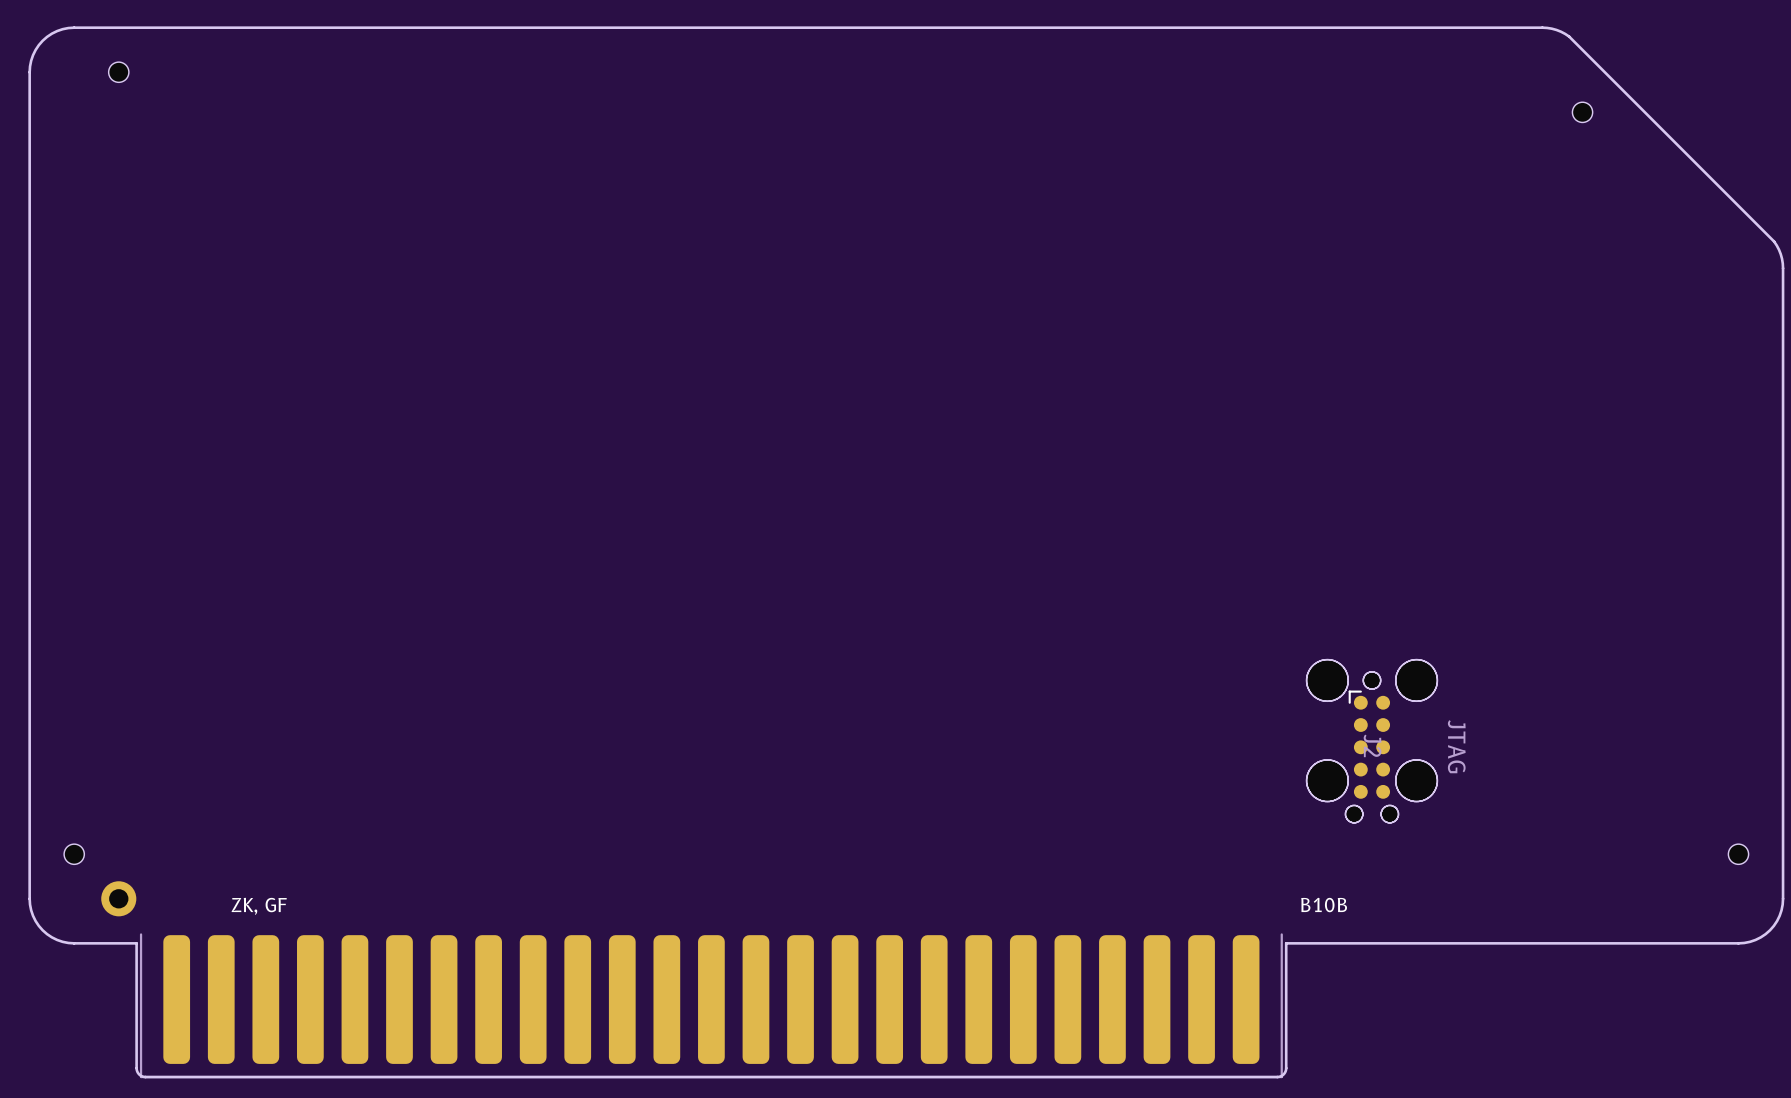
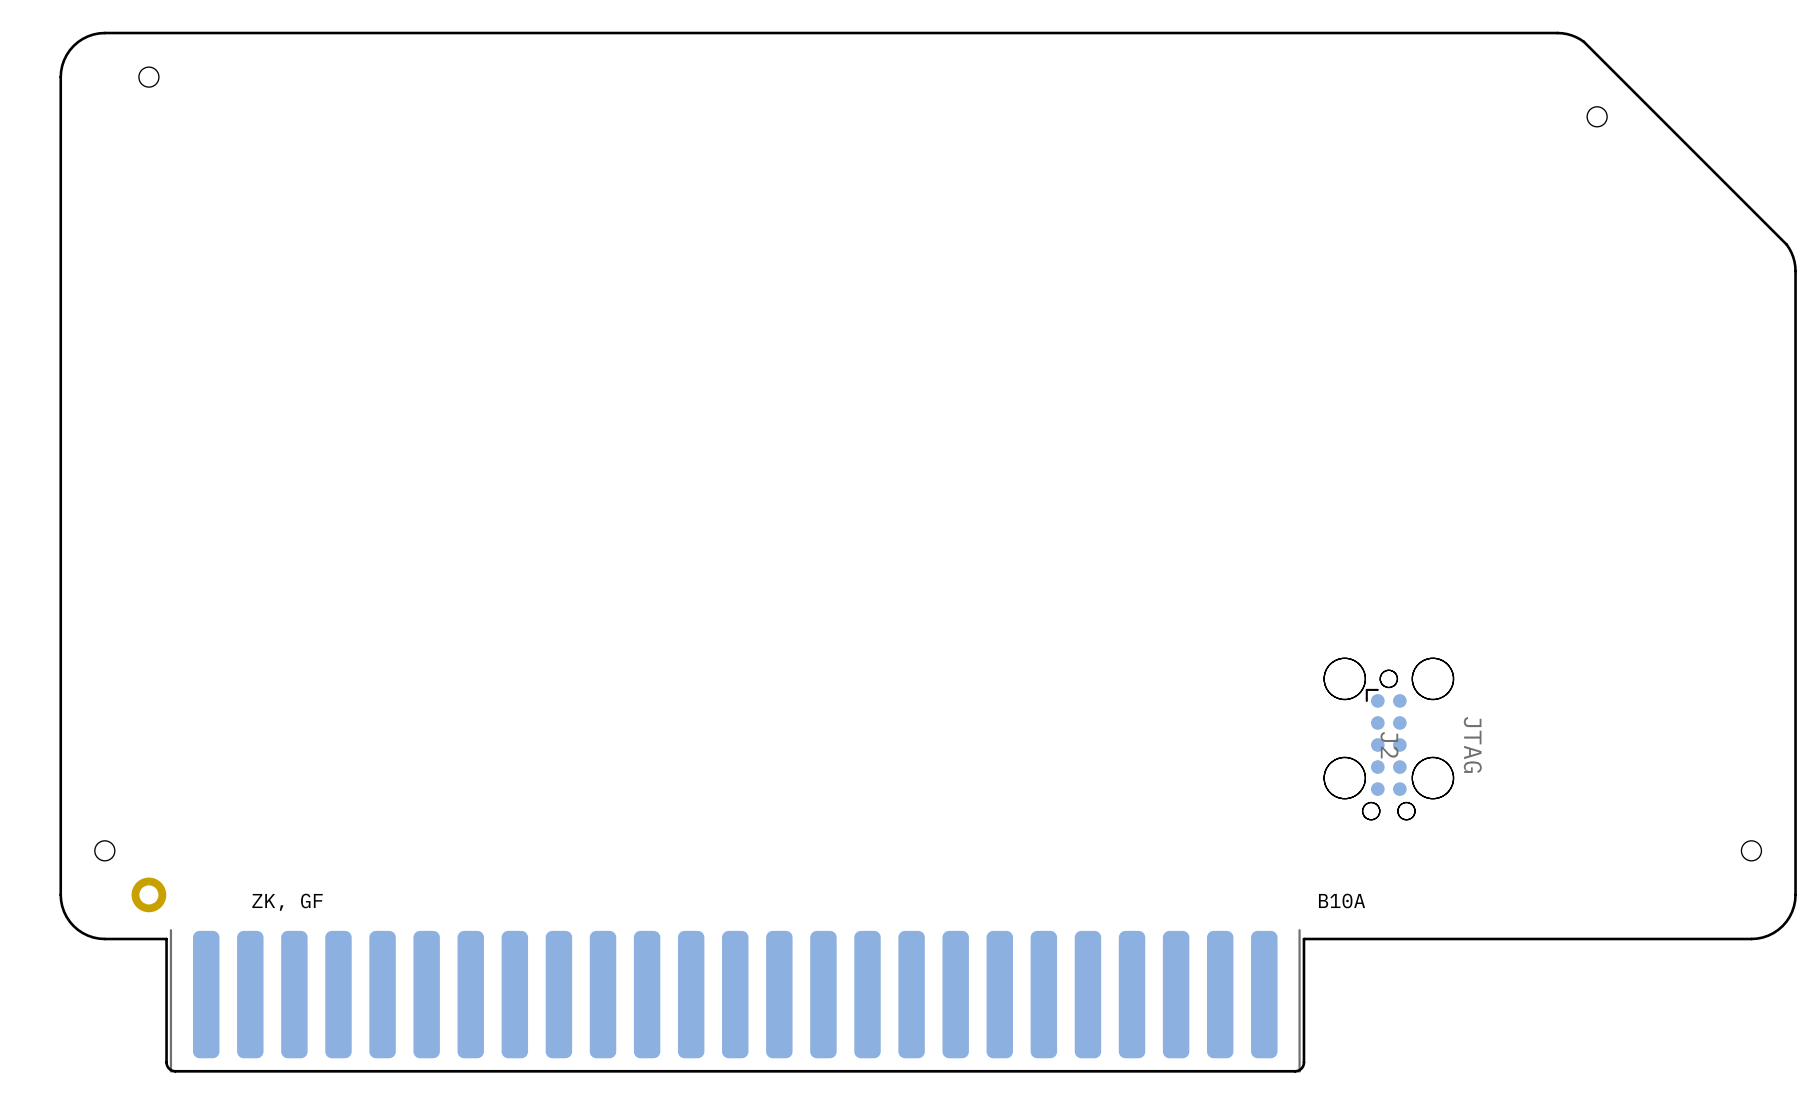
text: B10B (1324, 905) -> B10A (1342, 900)

